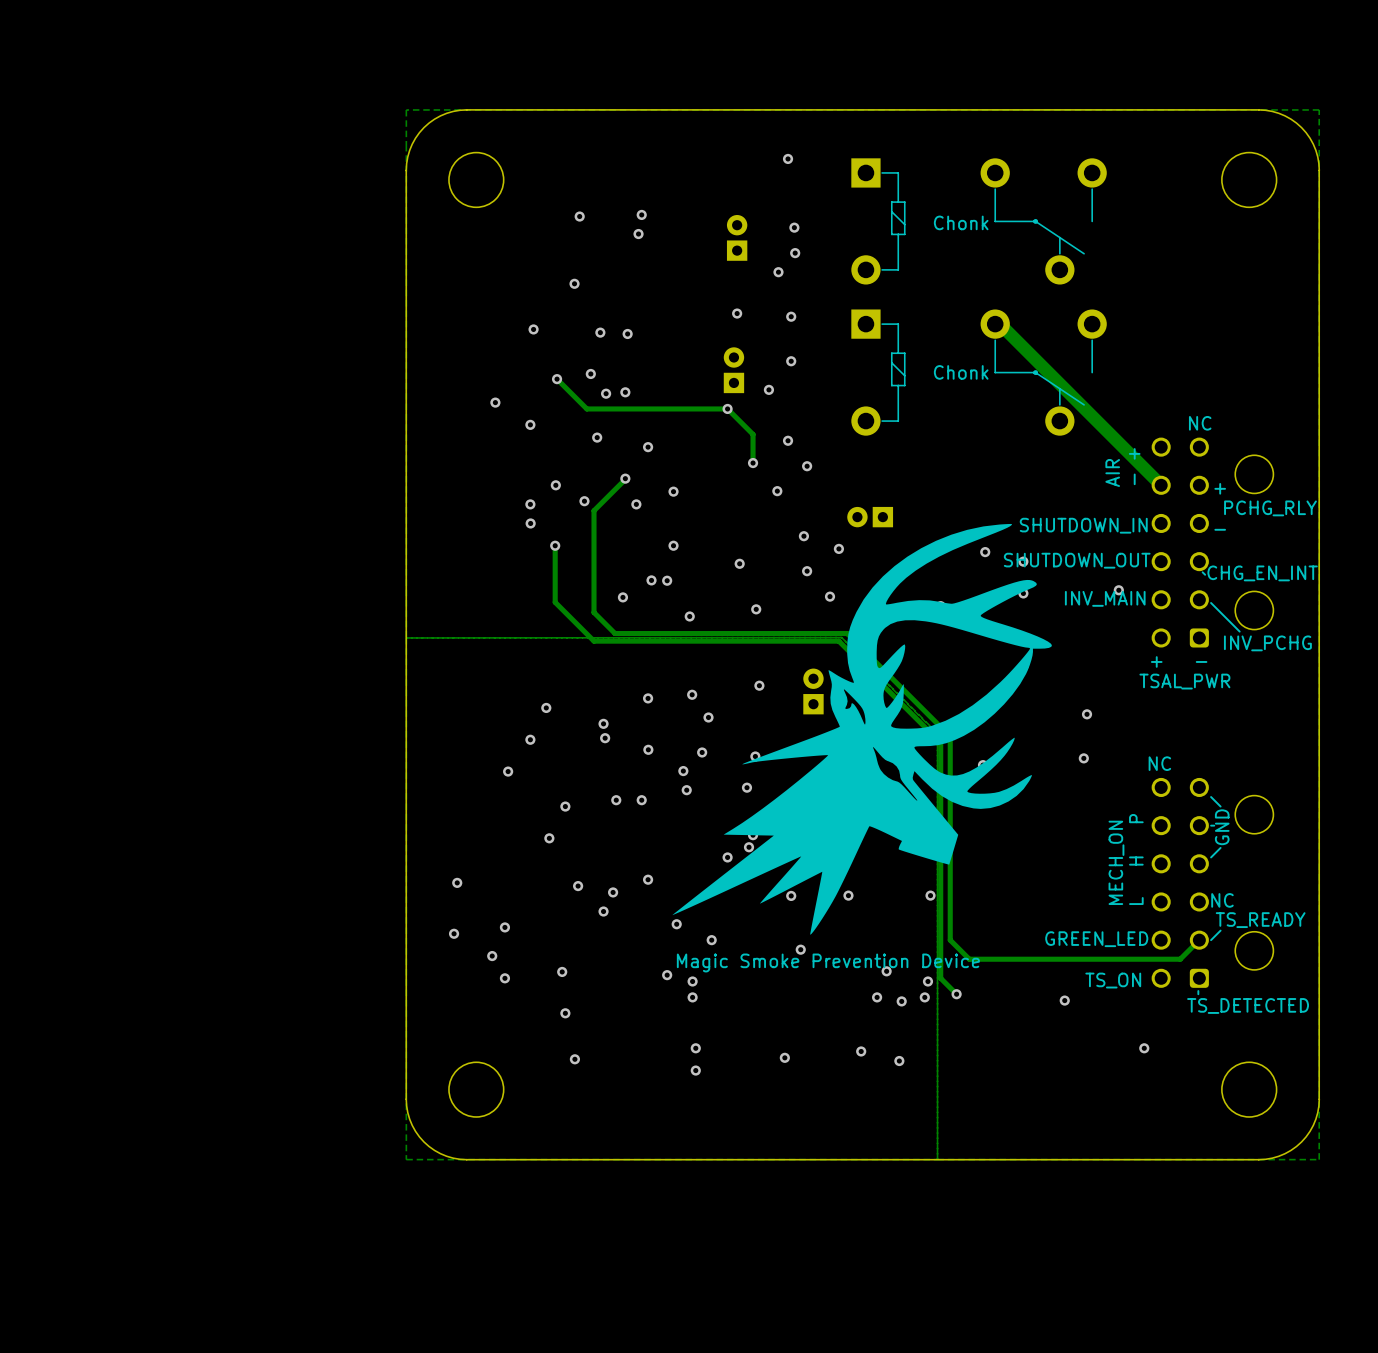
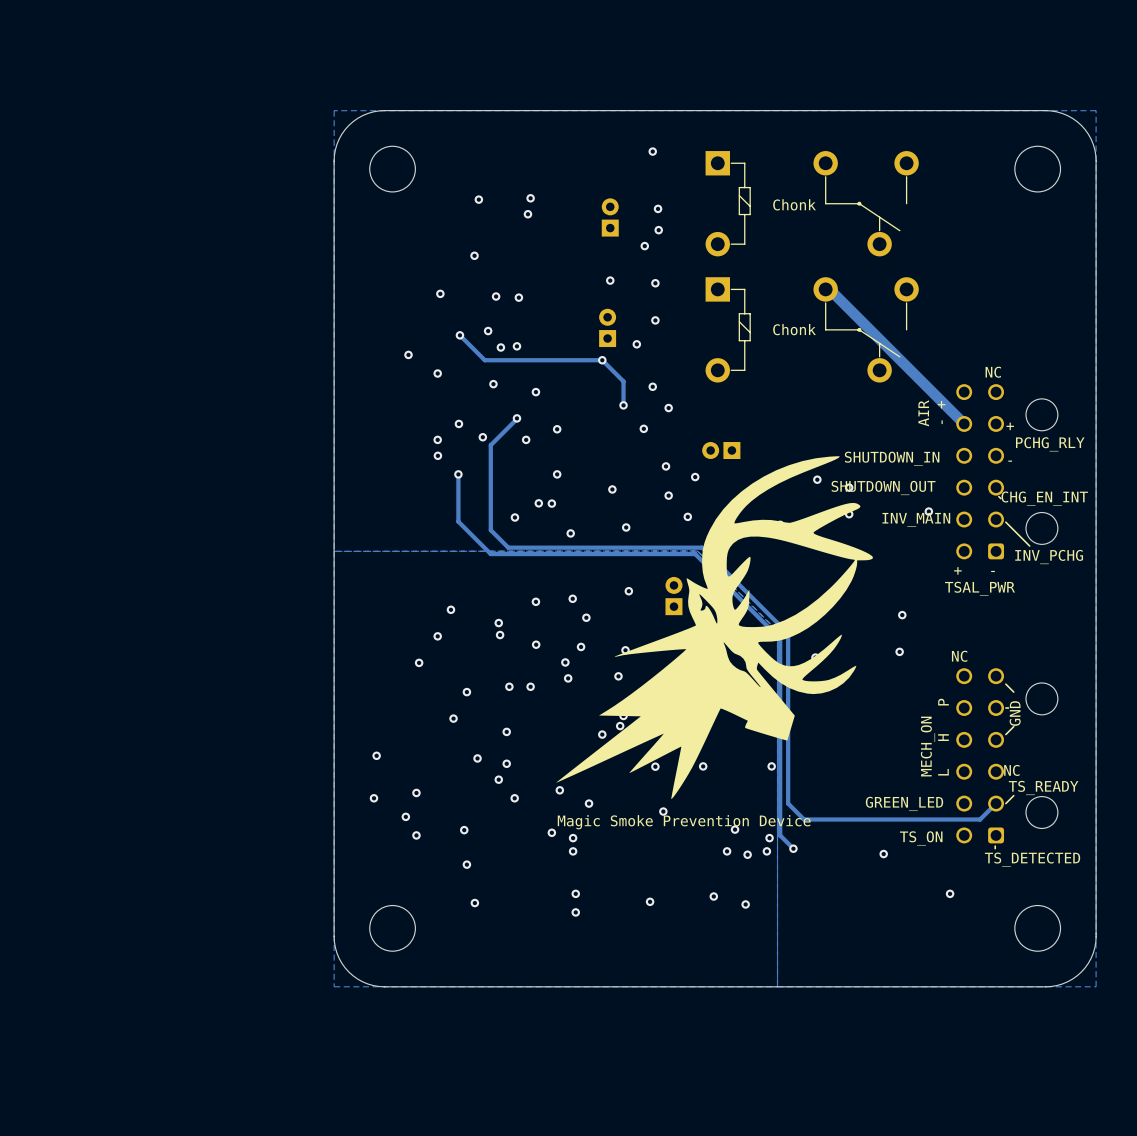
via: none -> (506, 731)
via: (648, 879) -> none
via: none -> (514, 798)

